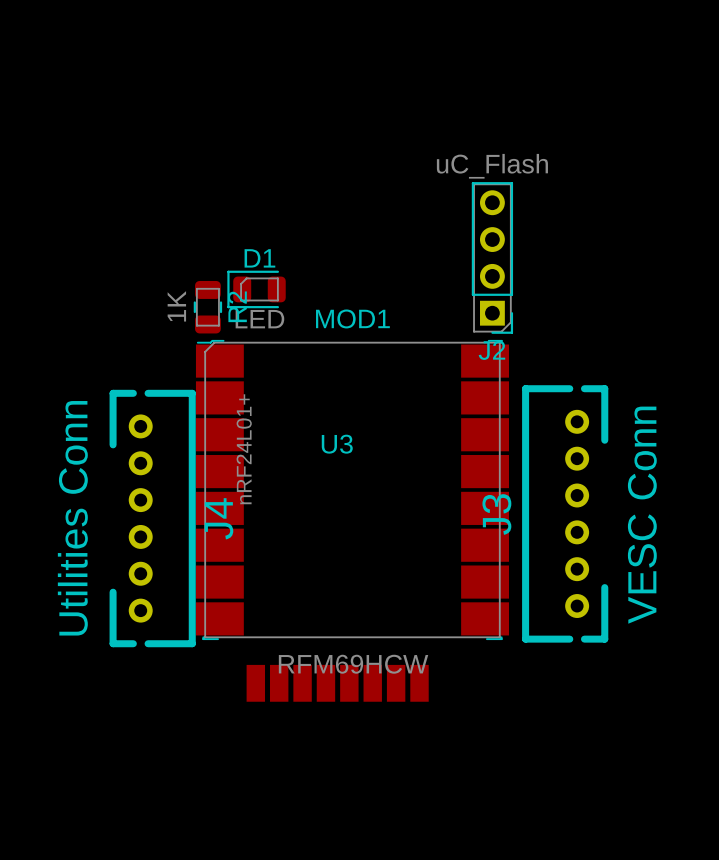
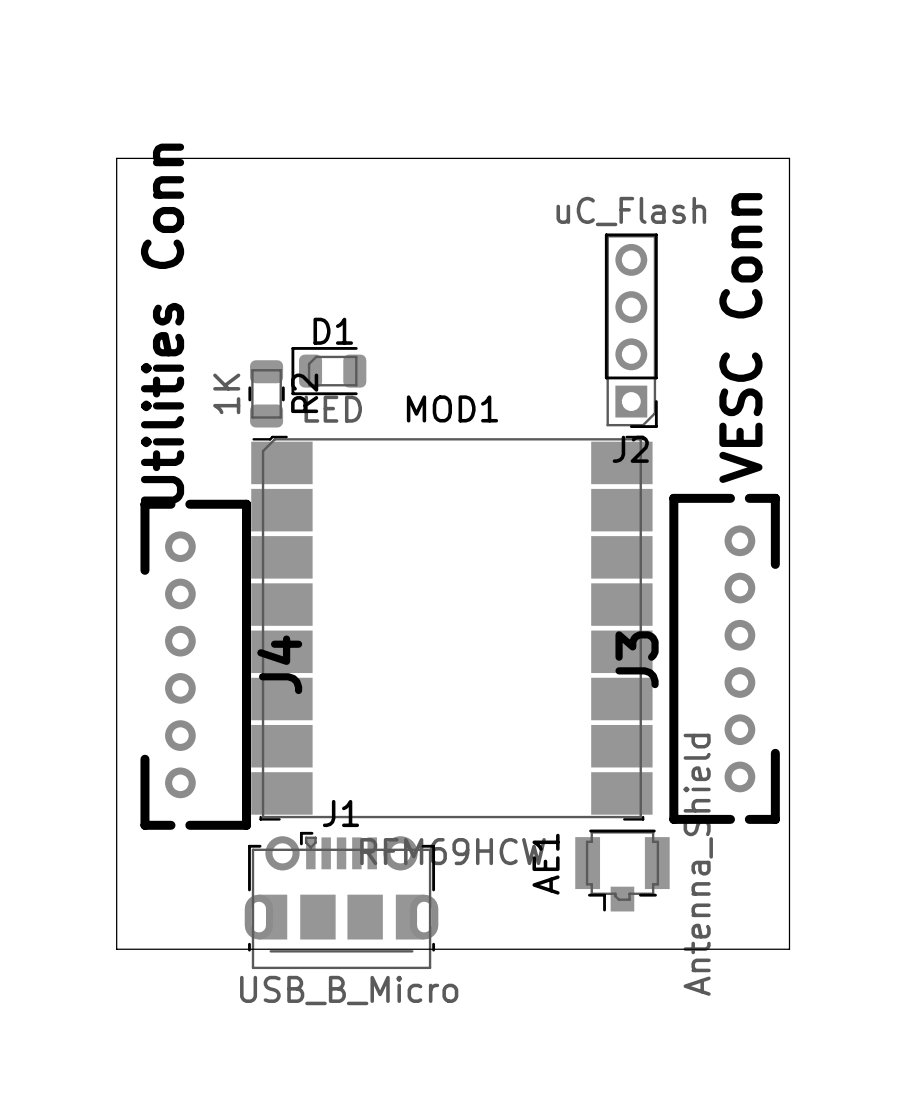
board edge: none -> (116, 158) (116, 949) (789, 949) (789, 158) (116, 158)
J3 value position: VESC Conn (642, 515) -> VESC Conn (740, 338)
J4 value position: Utilities Conn (72, 518) -> Utilities Conn (162, 323)
AE1: none -> Antenna_Shield (622, 870)
U3: nRF24L01+ (337, 683) -> none
J1: none -> USB_B_Micro (341, 900)

